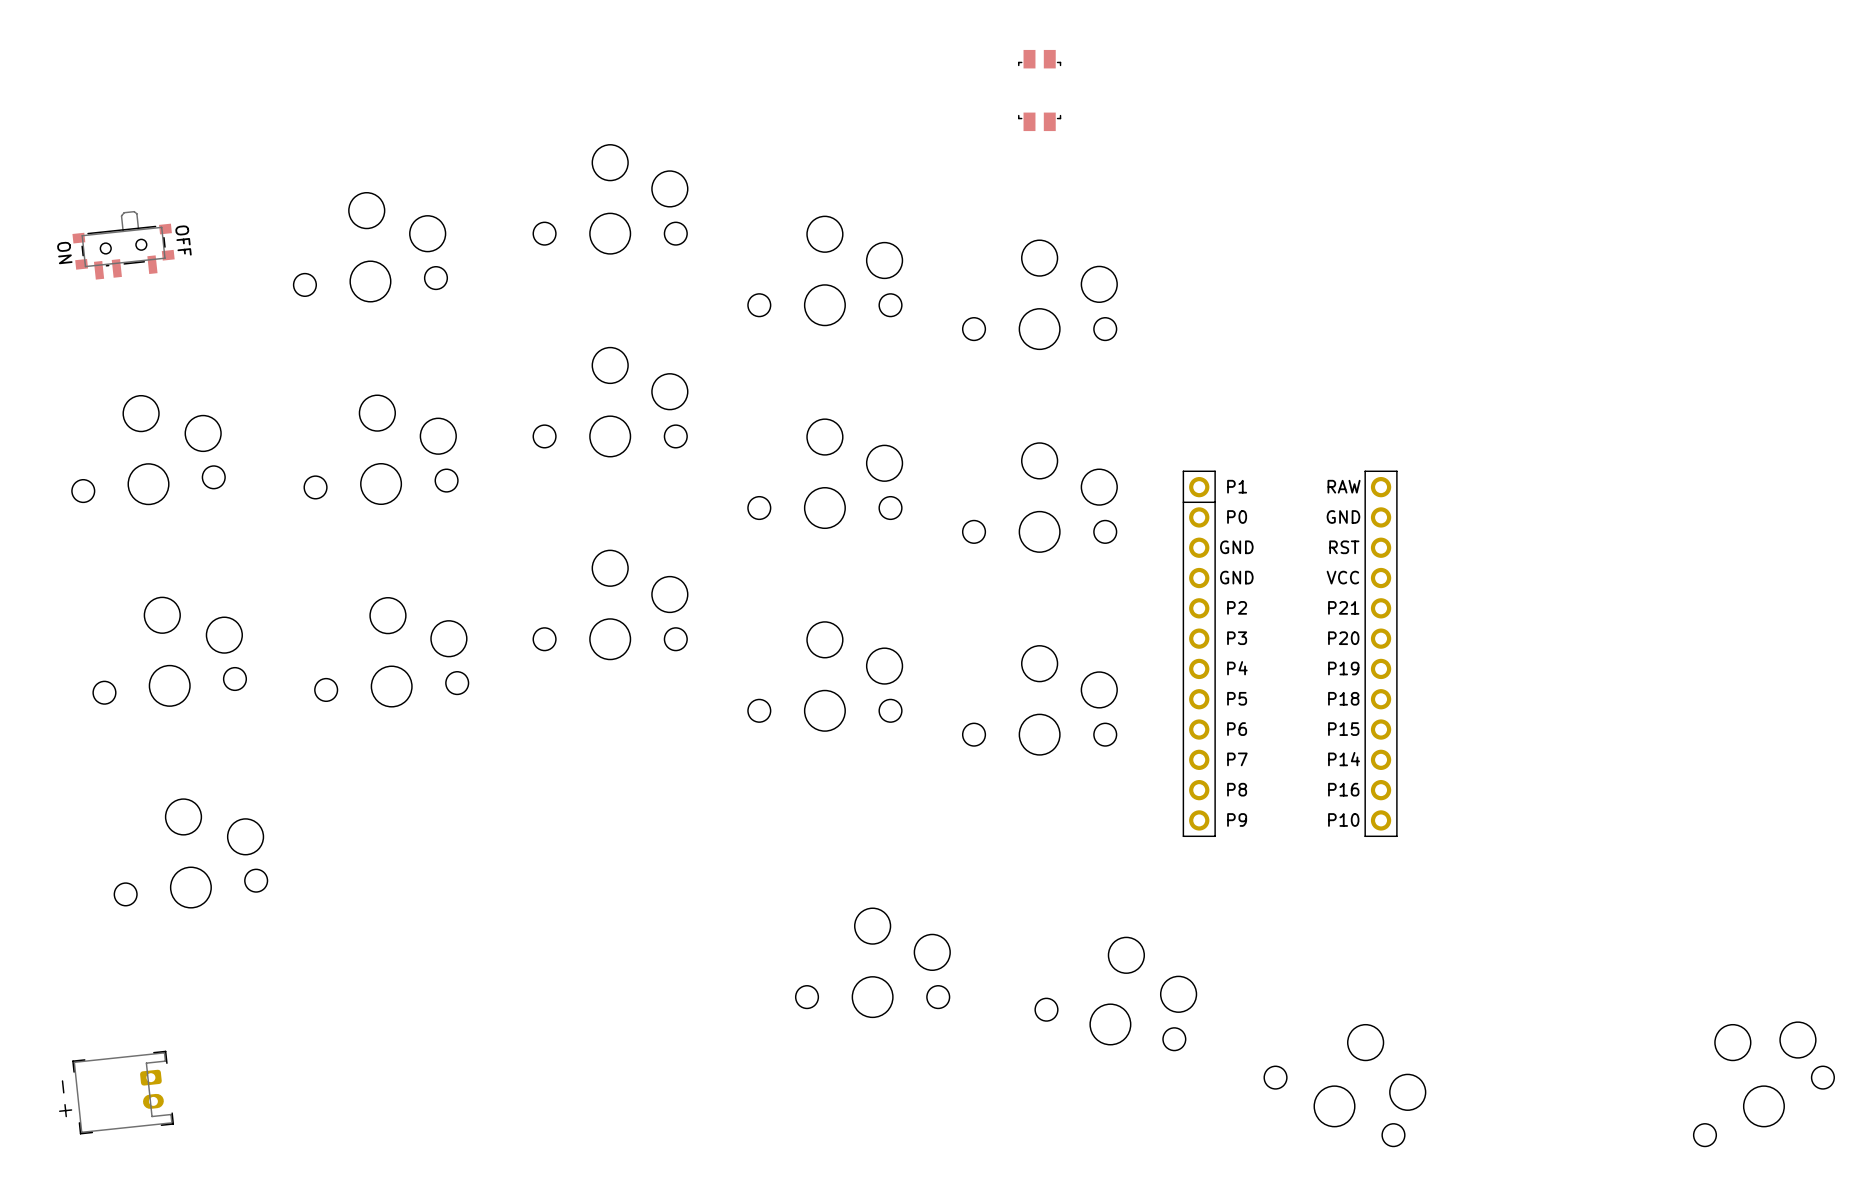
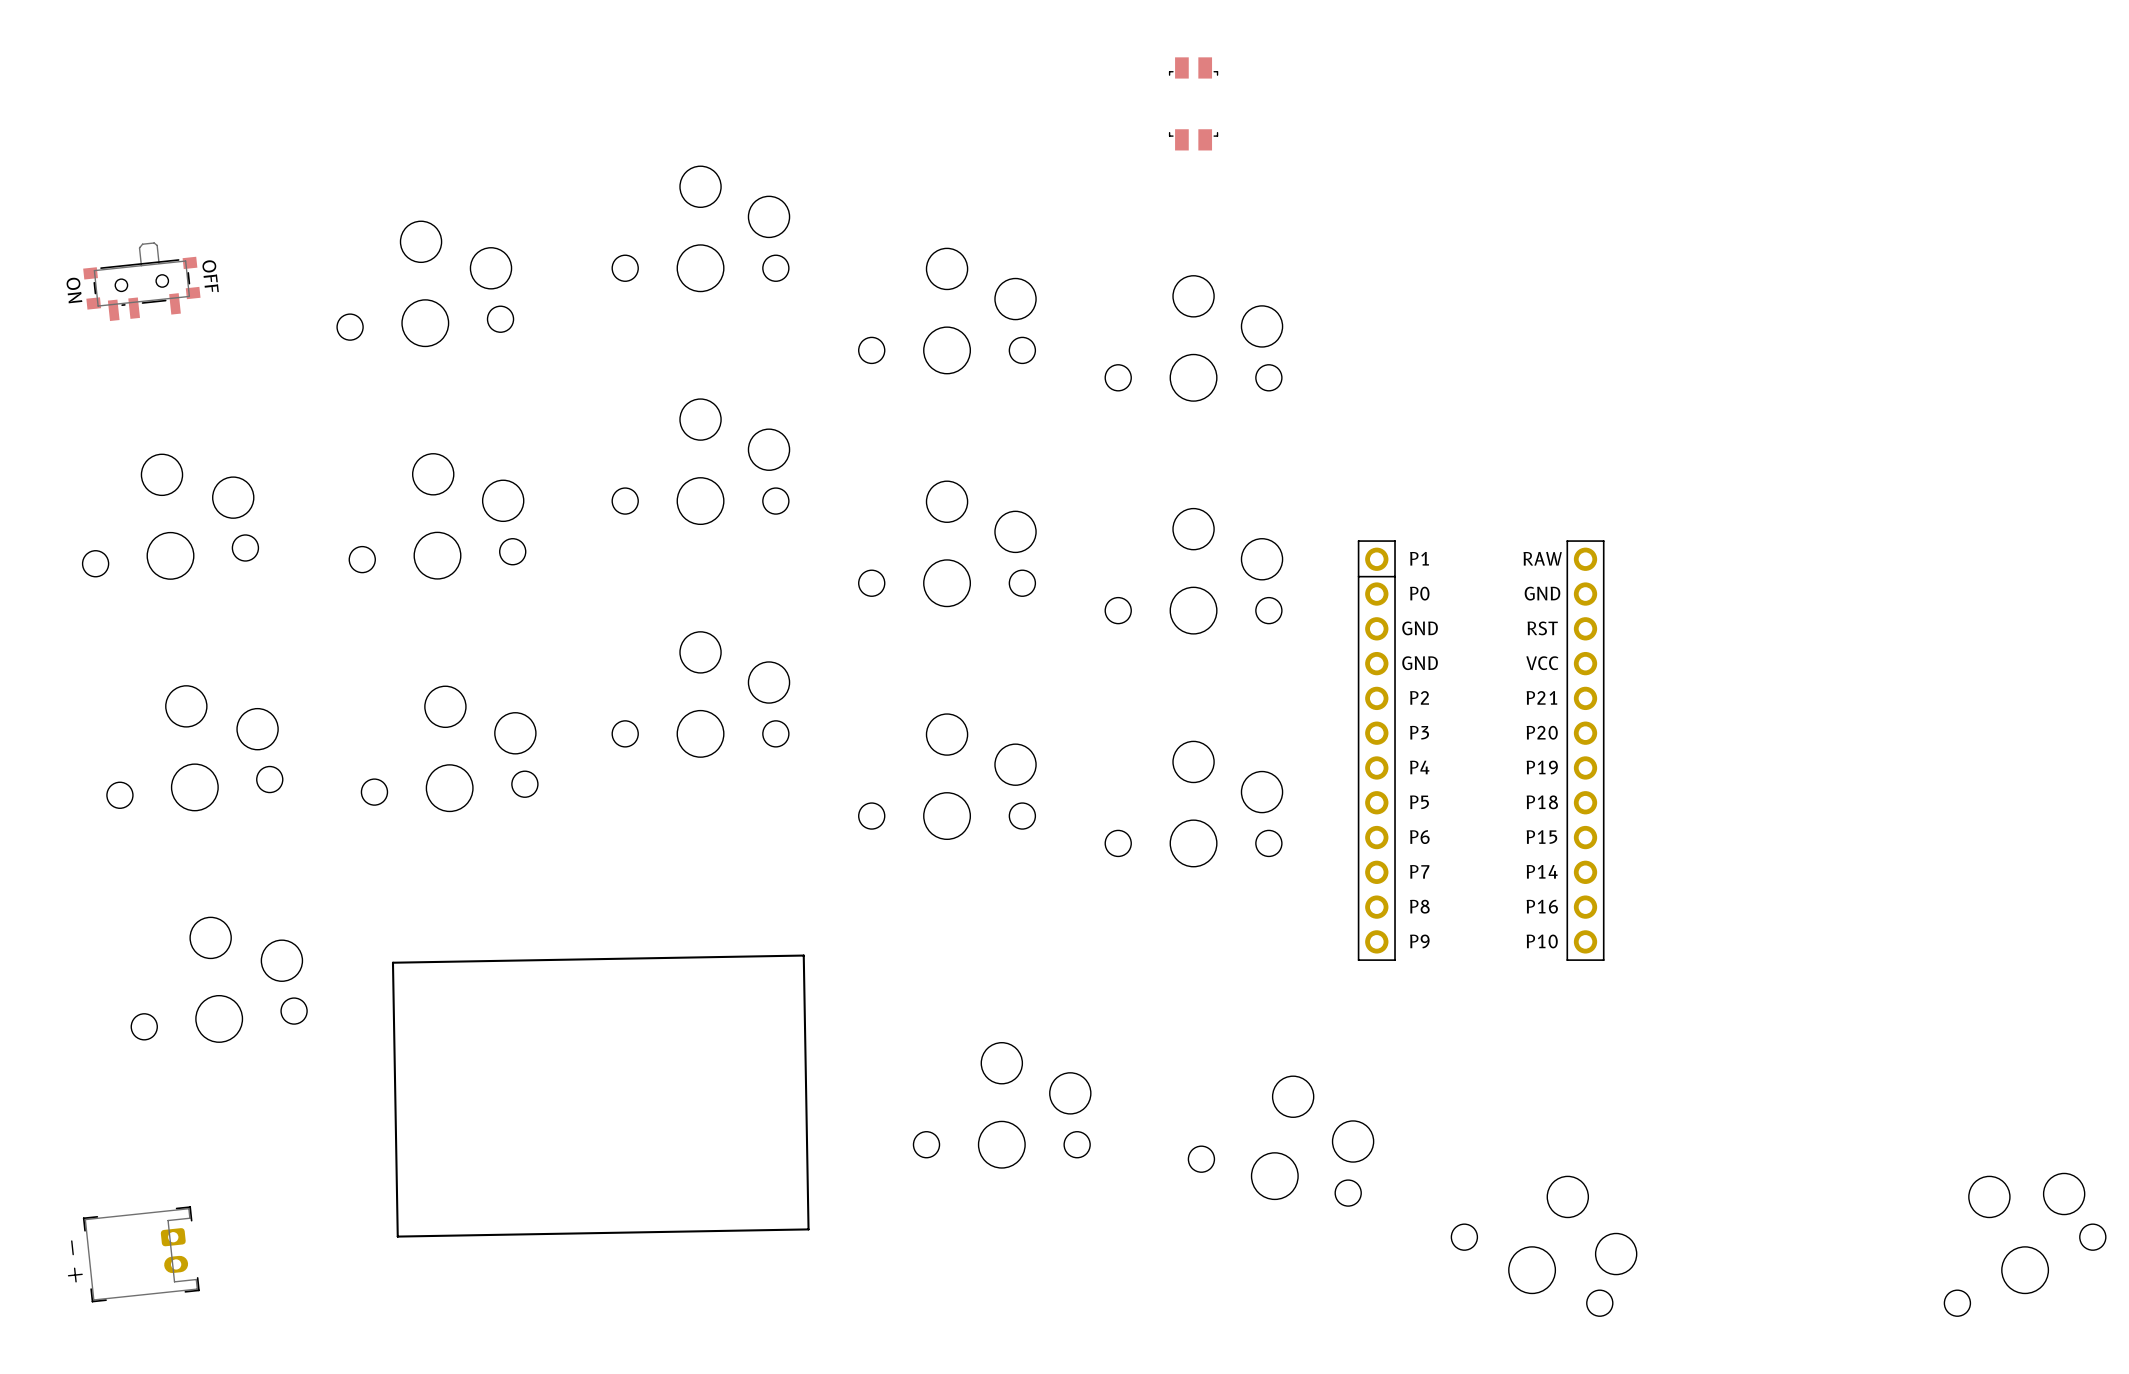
line: none -> (803, 955) (808, 1229) (397, 1236) (392, 962) (803, 955)

